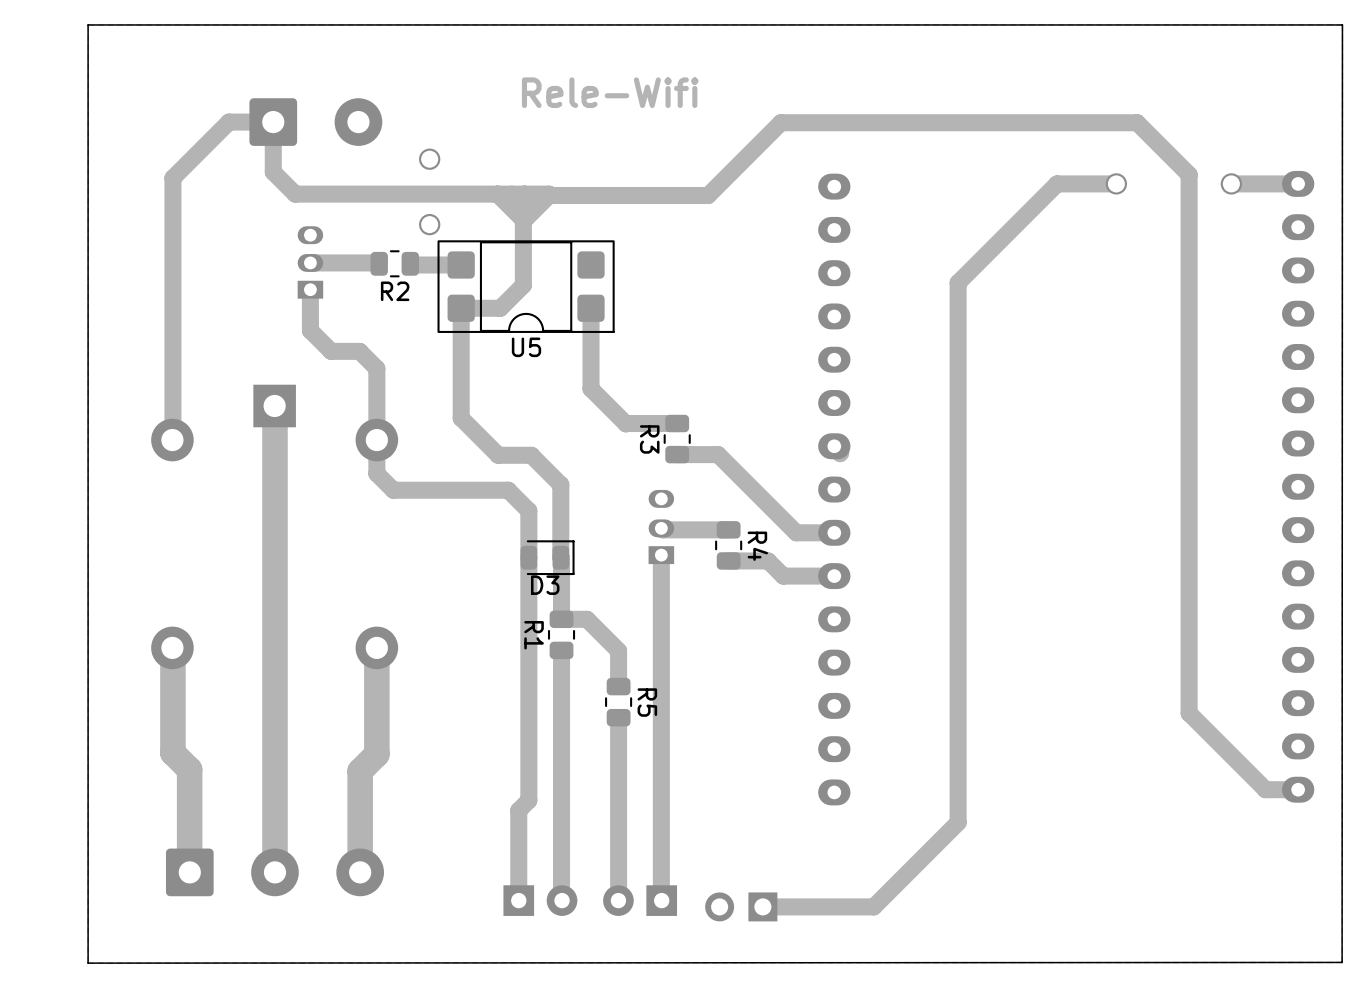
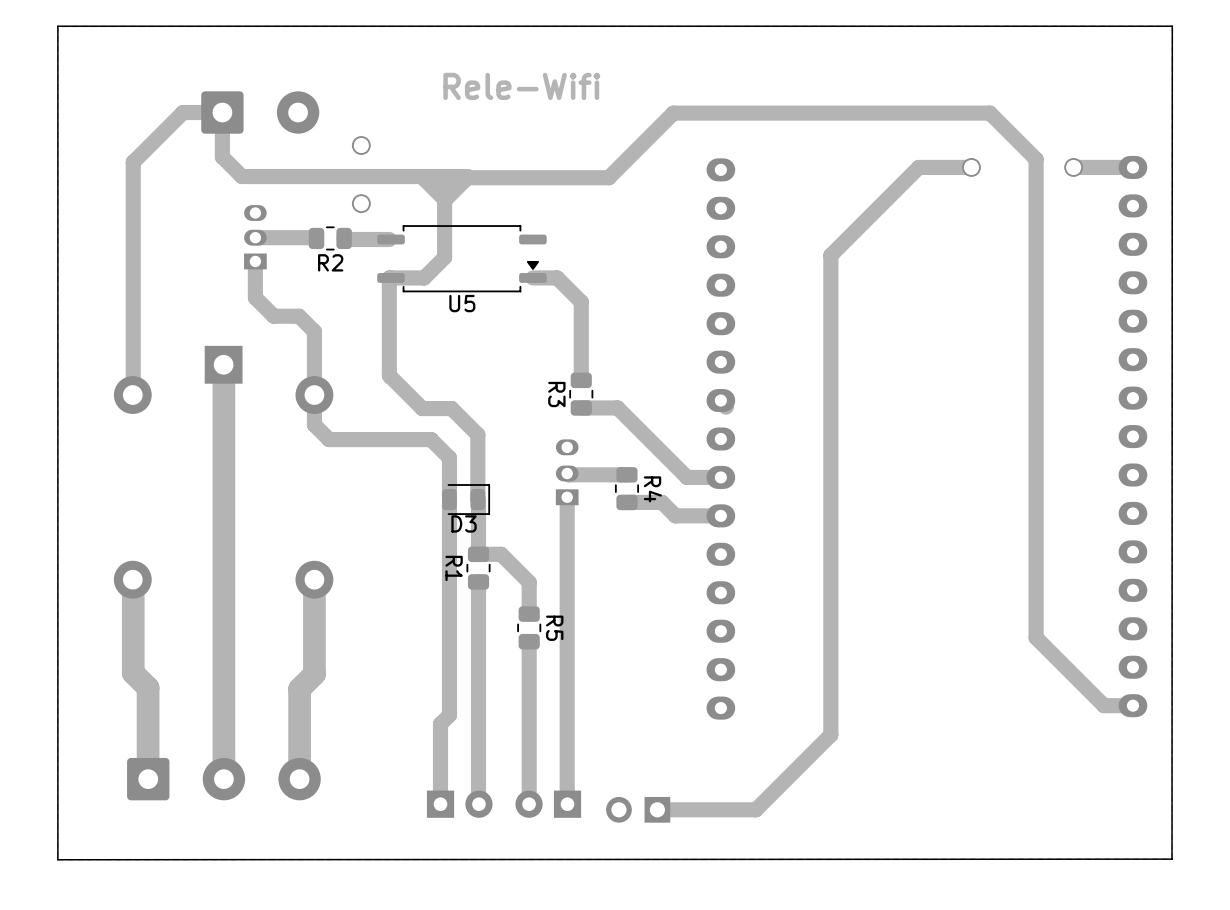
U5 footprint: [437, 240, 615, 333] -> [377, 225, 547, 293]
track: (591, 308) (591, 388) (626, 423) (677, 423) -> (532, 277) (557, 277) (581, 302) (581, 380)

